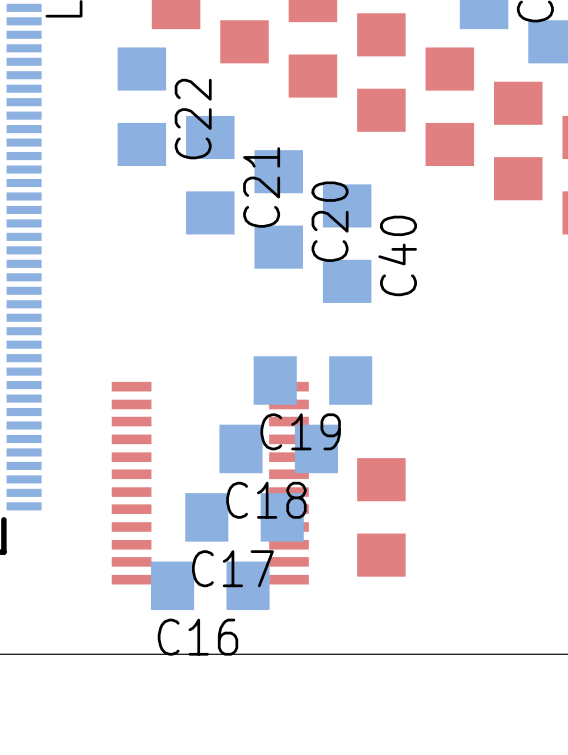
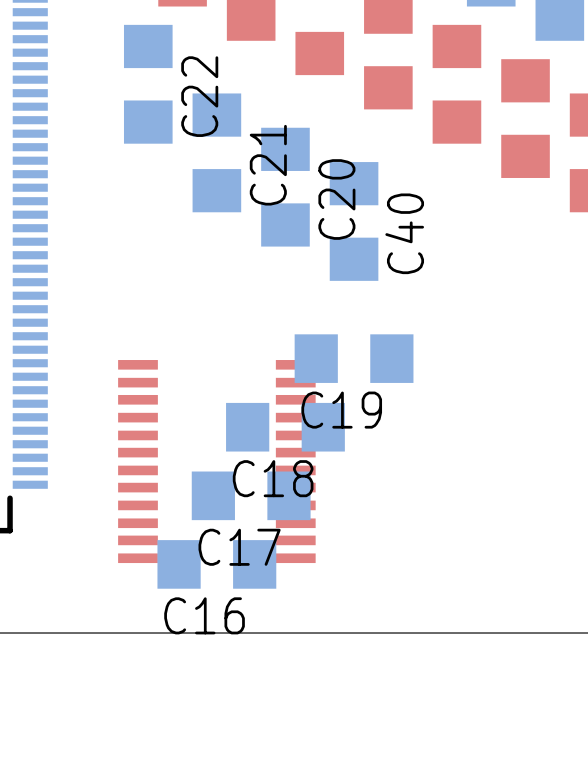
C19 position: (312, 380) -> (354, 358)
part: (381, 517) -> none

